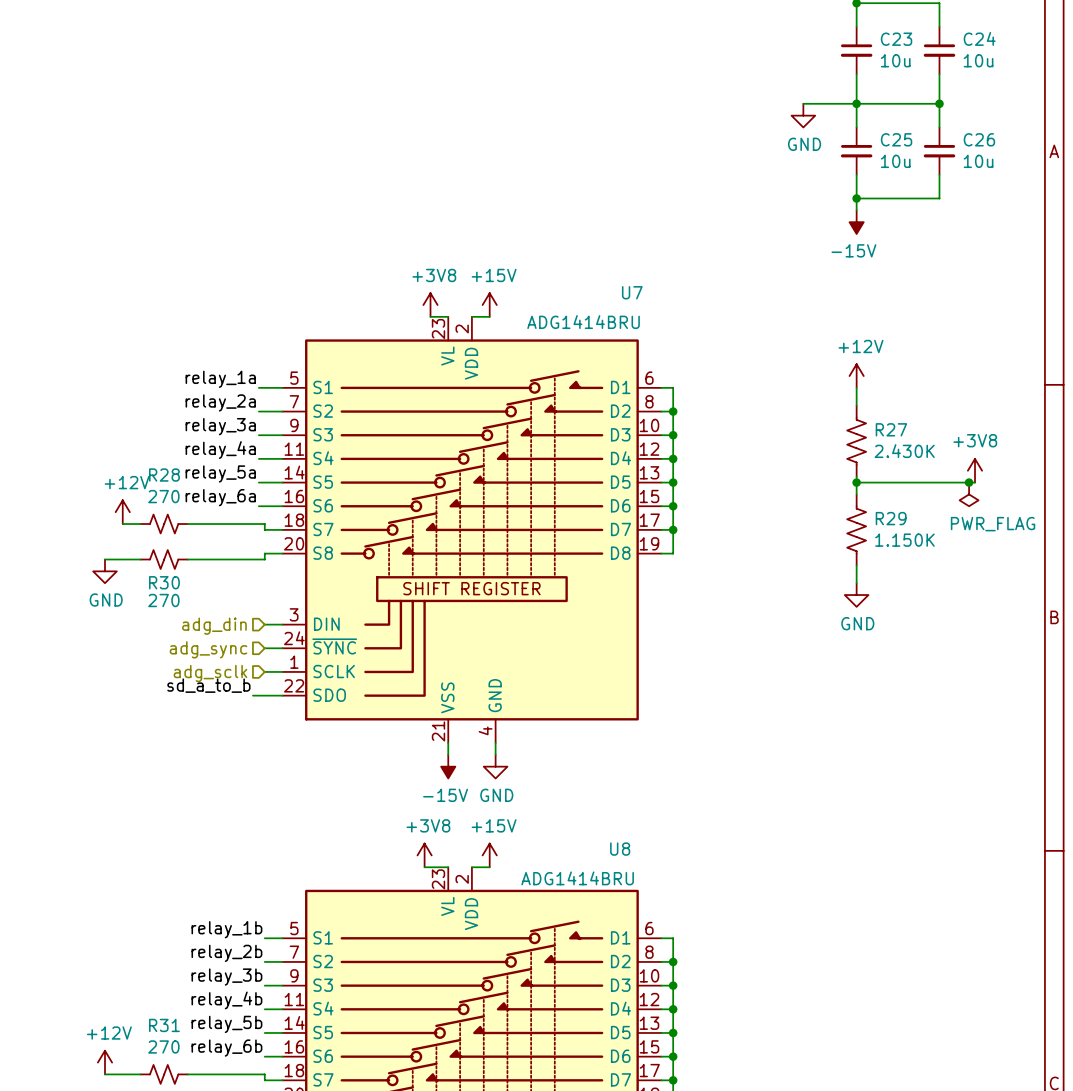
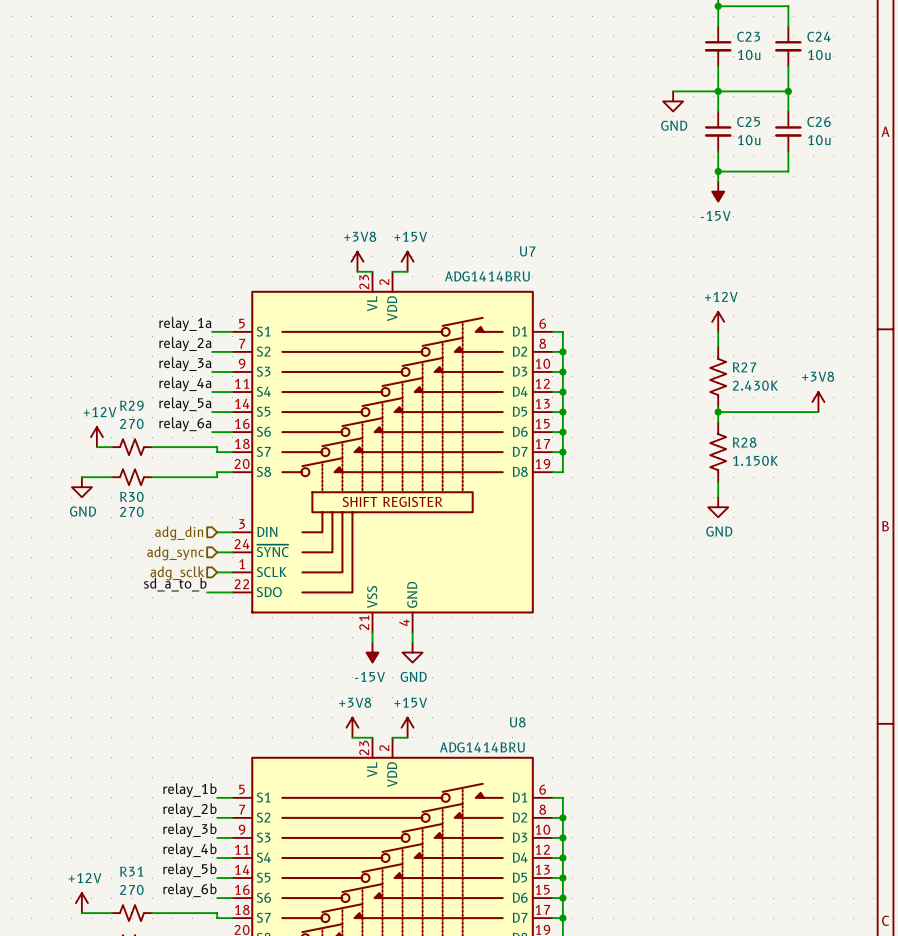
R28 name: R28 (164, 475) -> R29 (131, 405)
junction: (969, 482) -> none
power symbol: PWR_FLAG (969, 494) -> none
R29 name: R29 (891, 518) -> R28 (744, 442)

